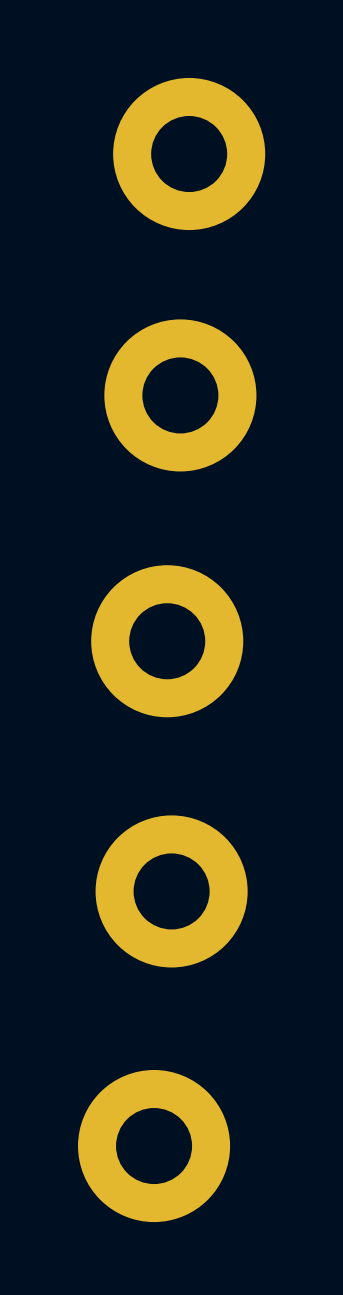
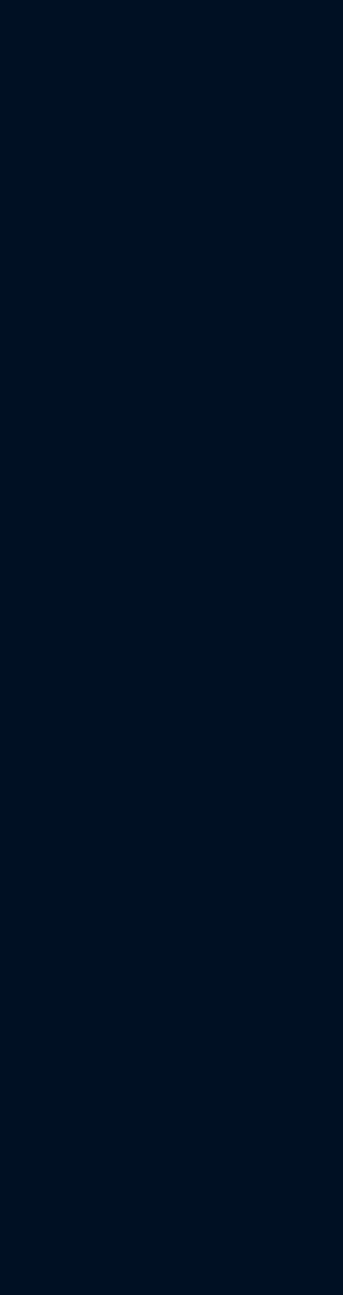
part: (189, 154) -> none
part: (180, 395) -> none
part: (167, 641) -> none
part: (171, 891) -> none
part: (154, 1146) -> none

